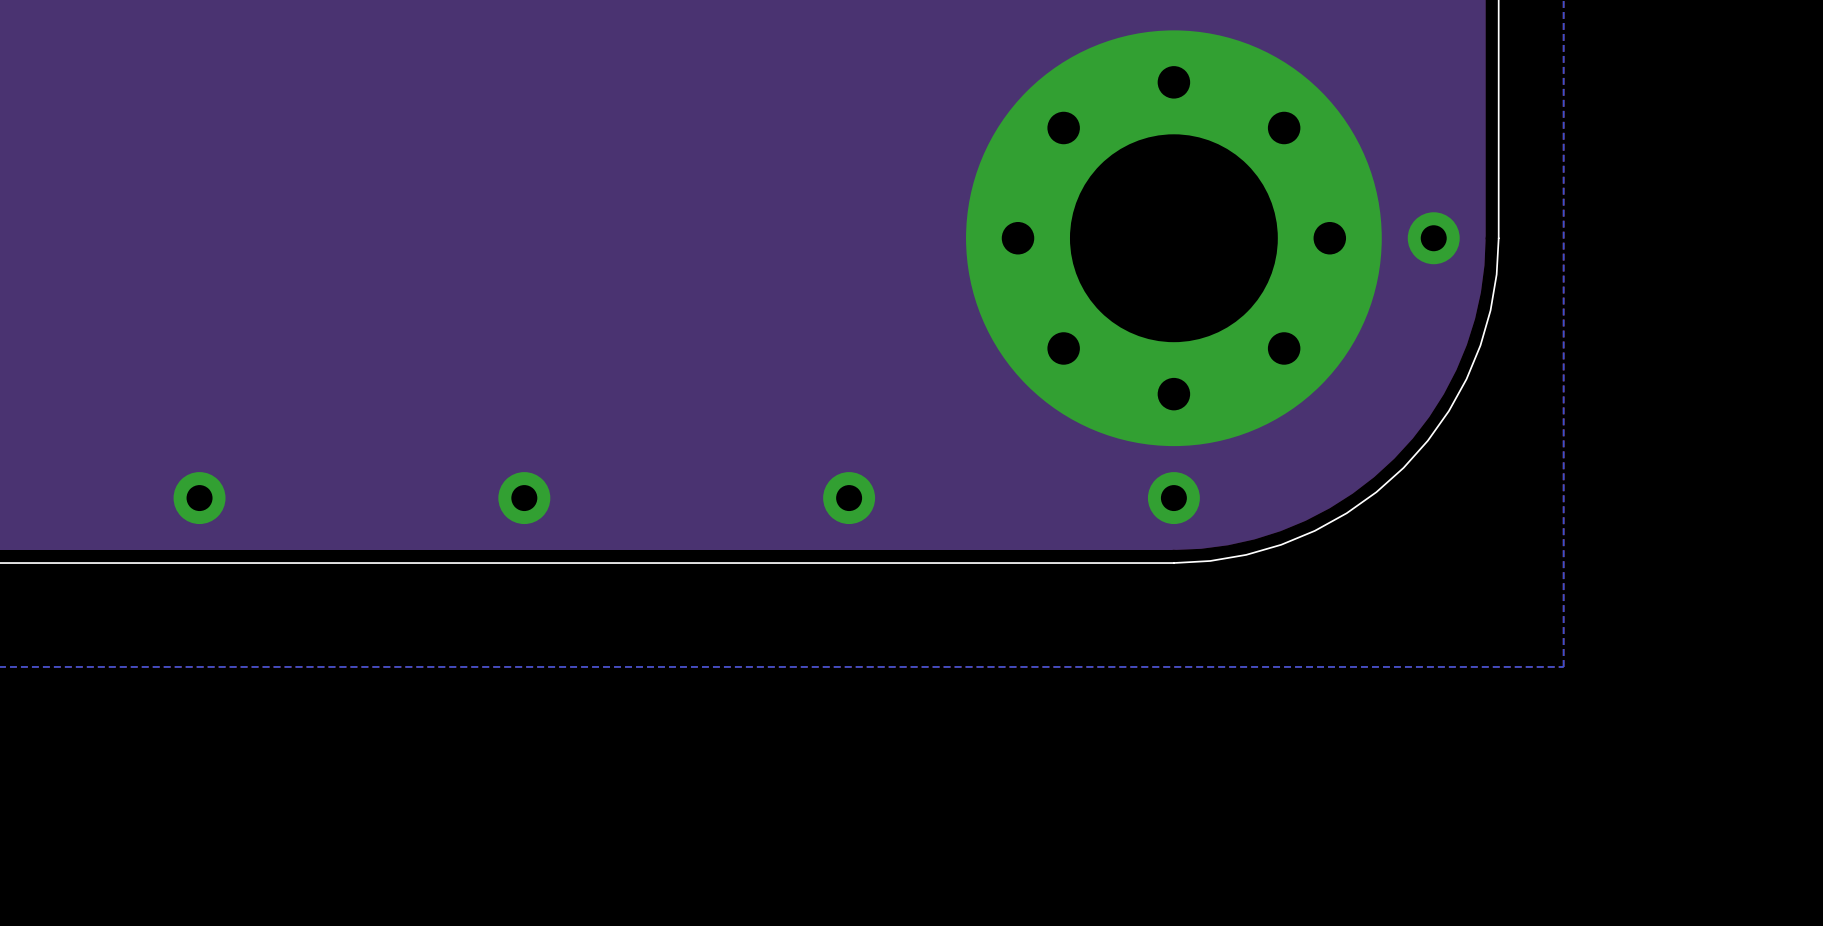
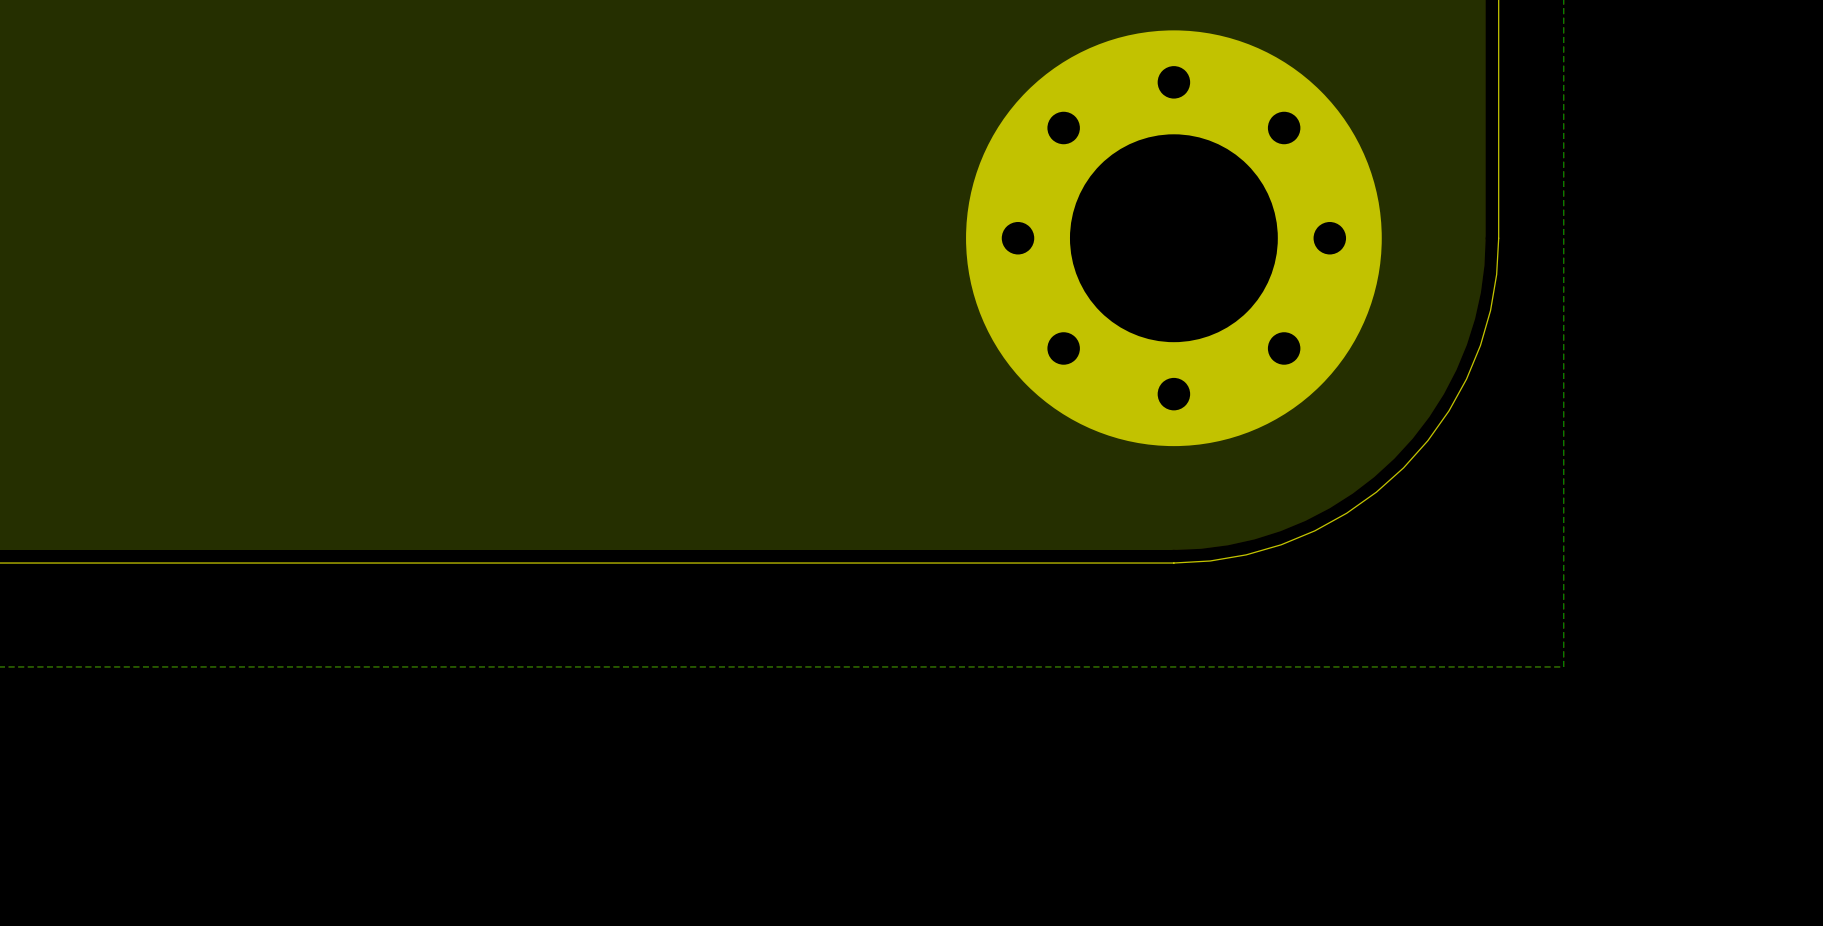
via: (1433, 238) -> none
via: (199, 498) -> none
via: (524, 498) -> none
via: (849, 498) -> none
via: (1173, 498) -> none

